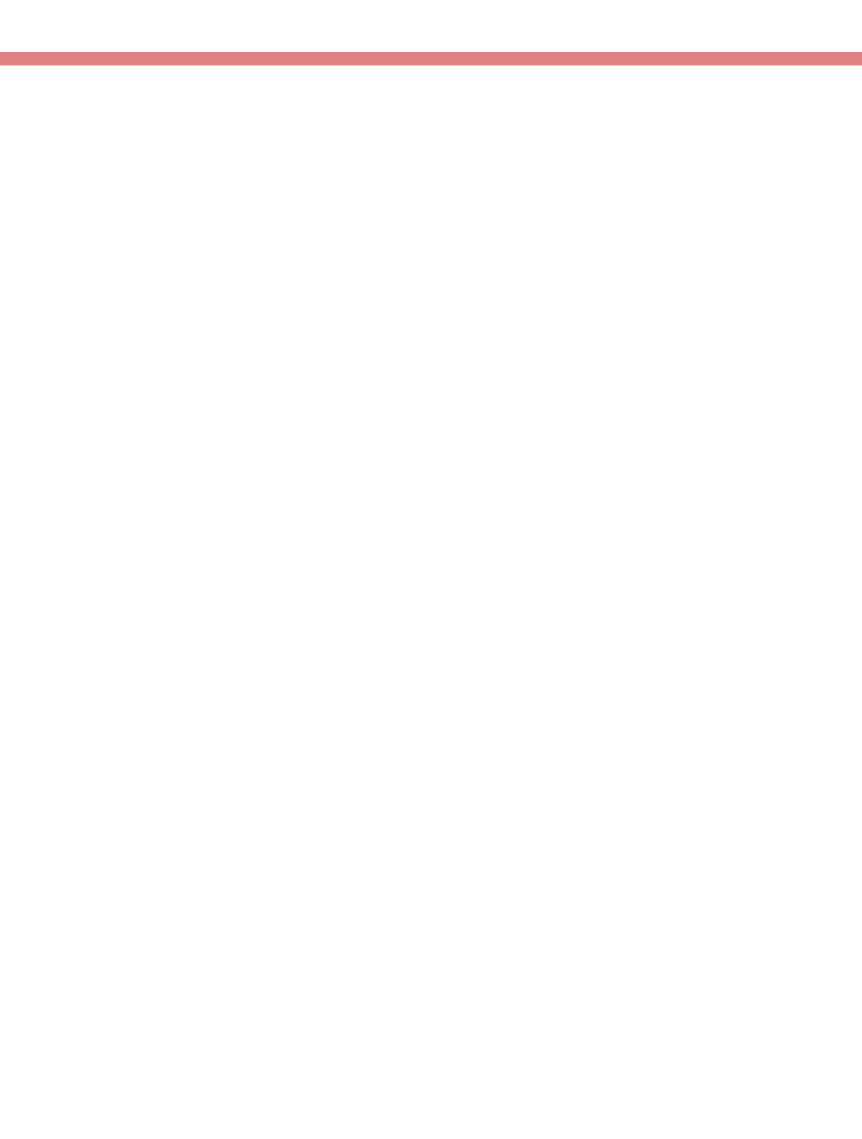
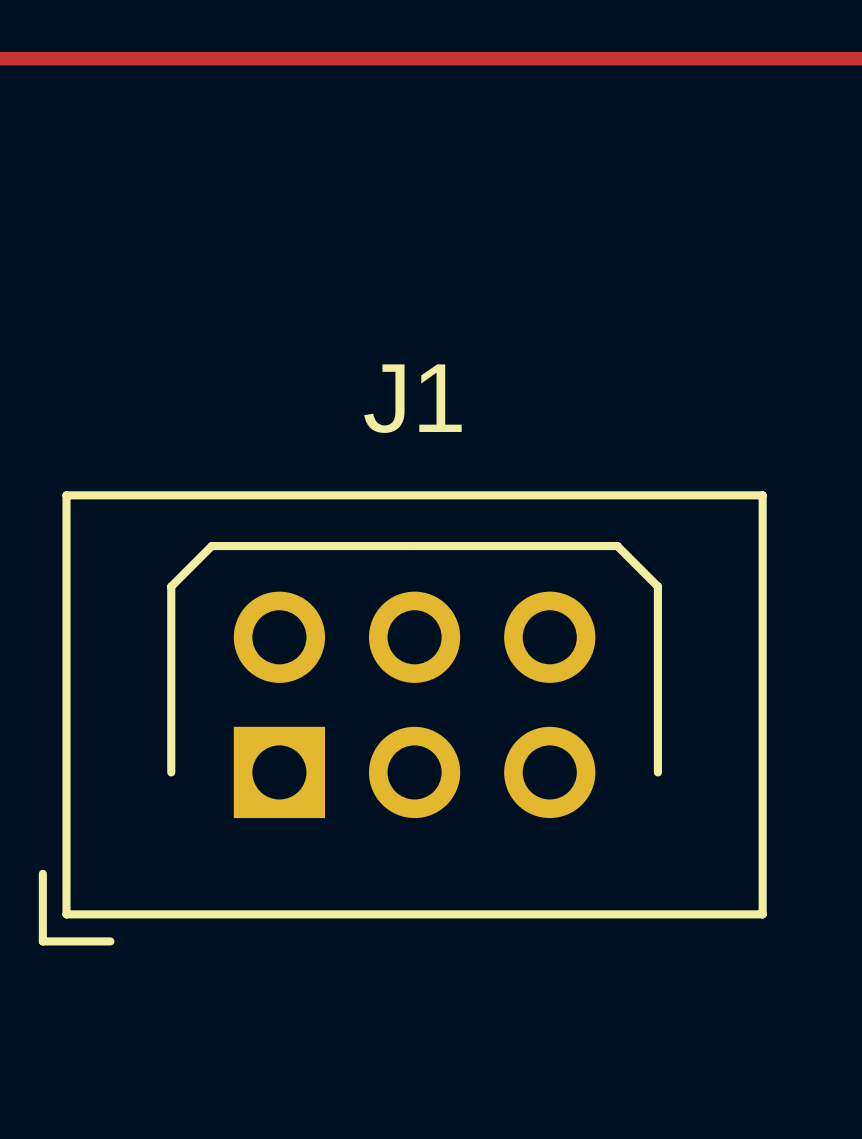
J1: none -> (402, 718)

